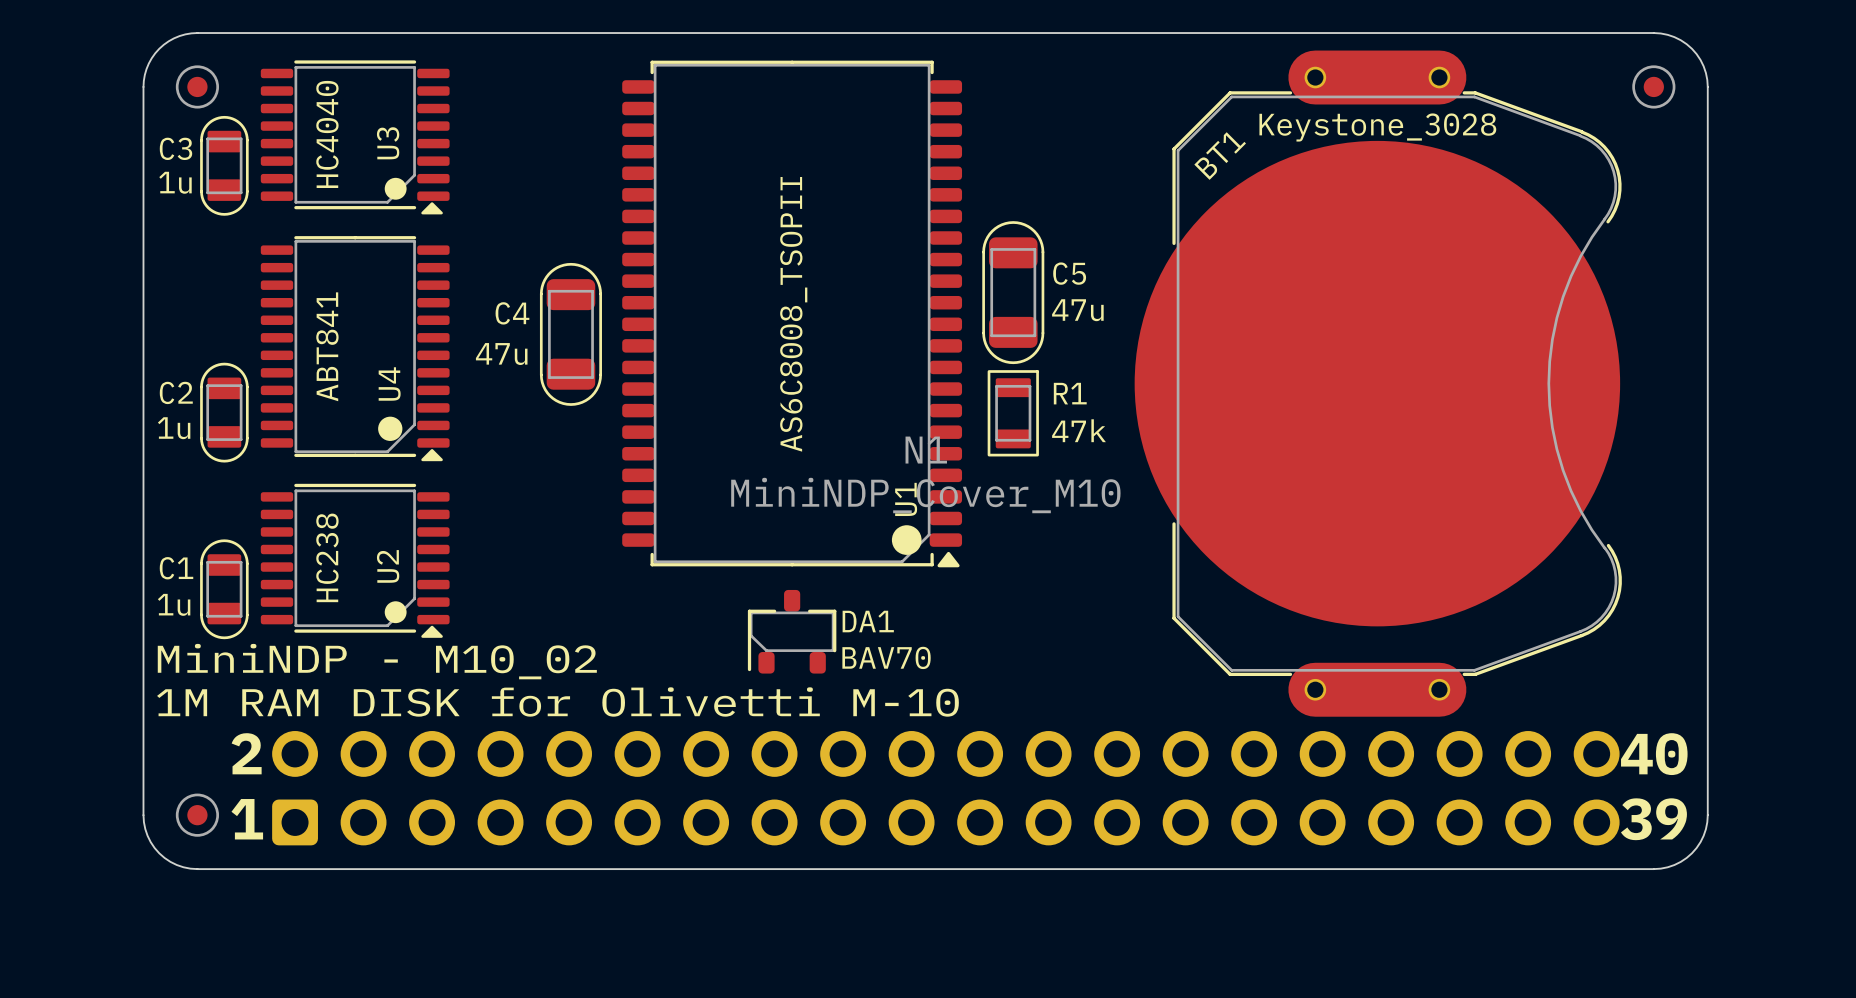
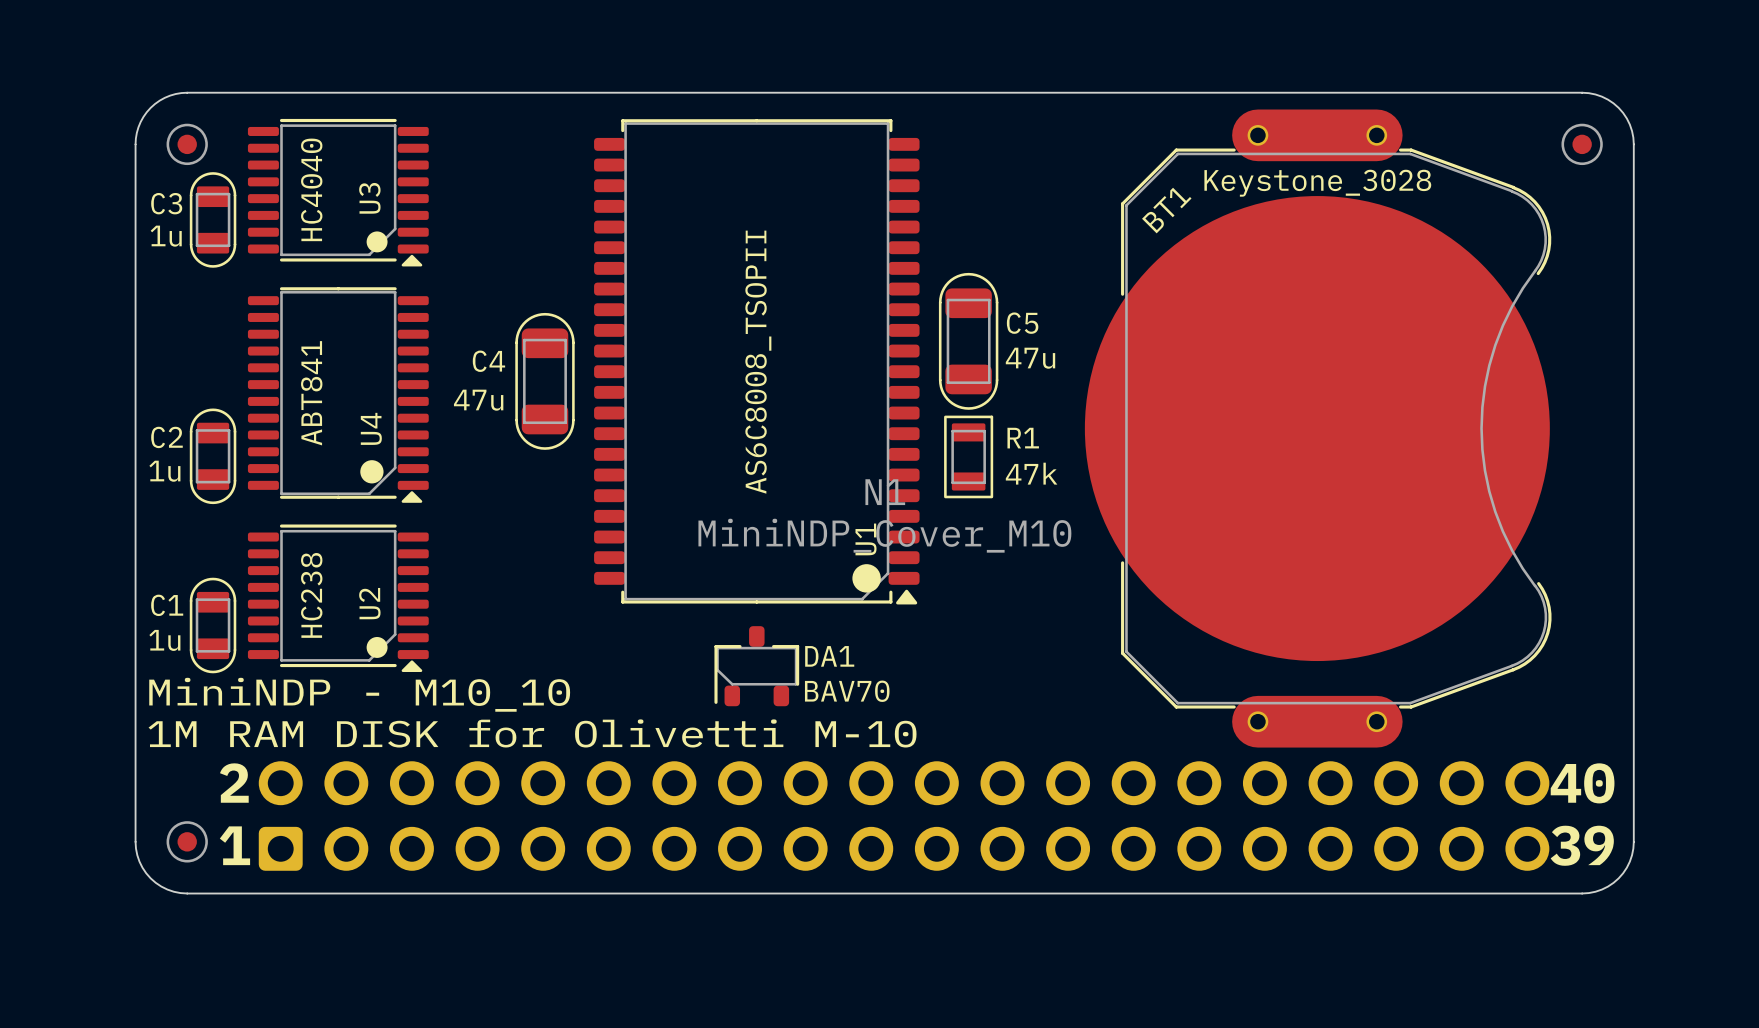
text: MiniNDP - M10_02 (377, 661) -> MiniNDP - M10_10 (359, 694)

